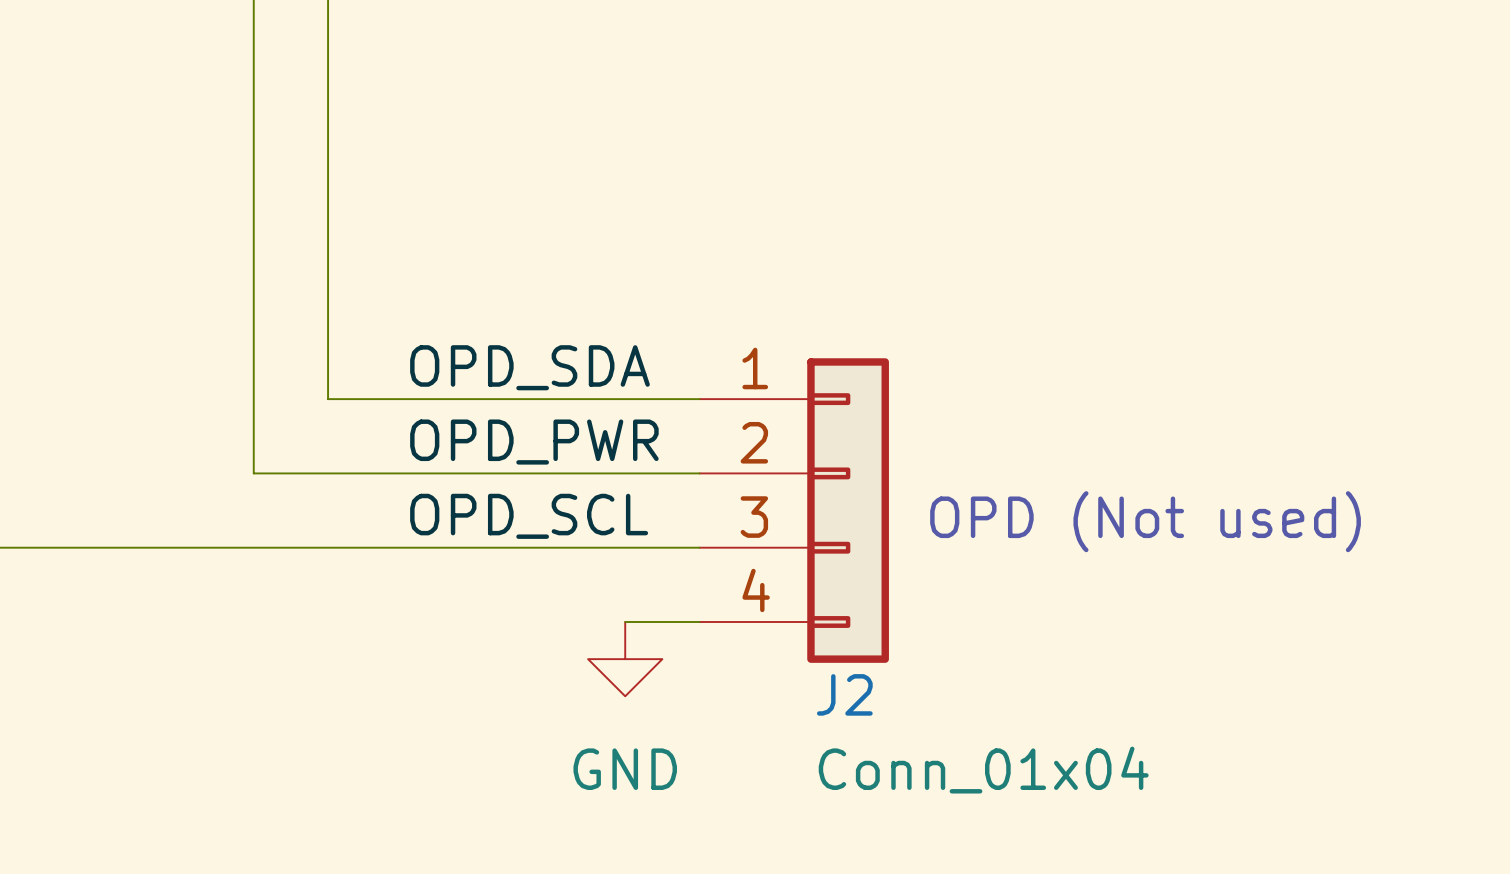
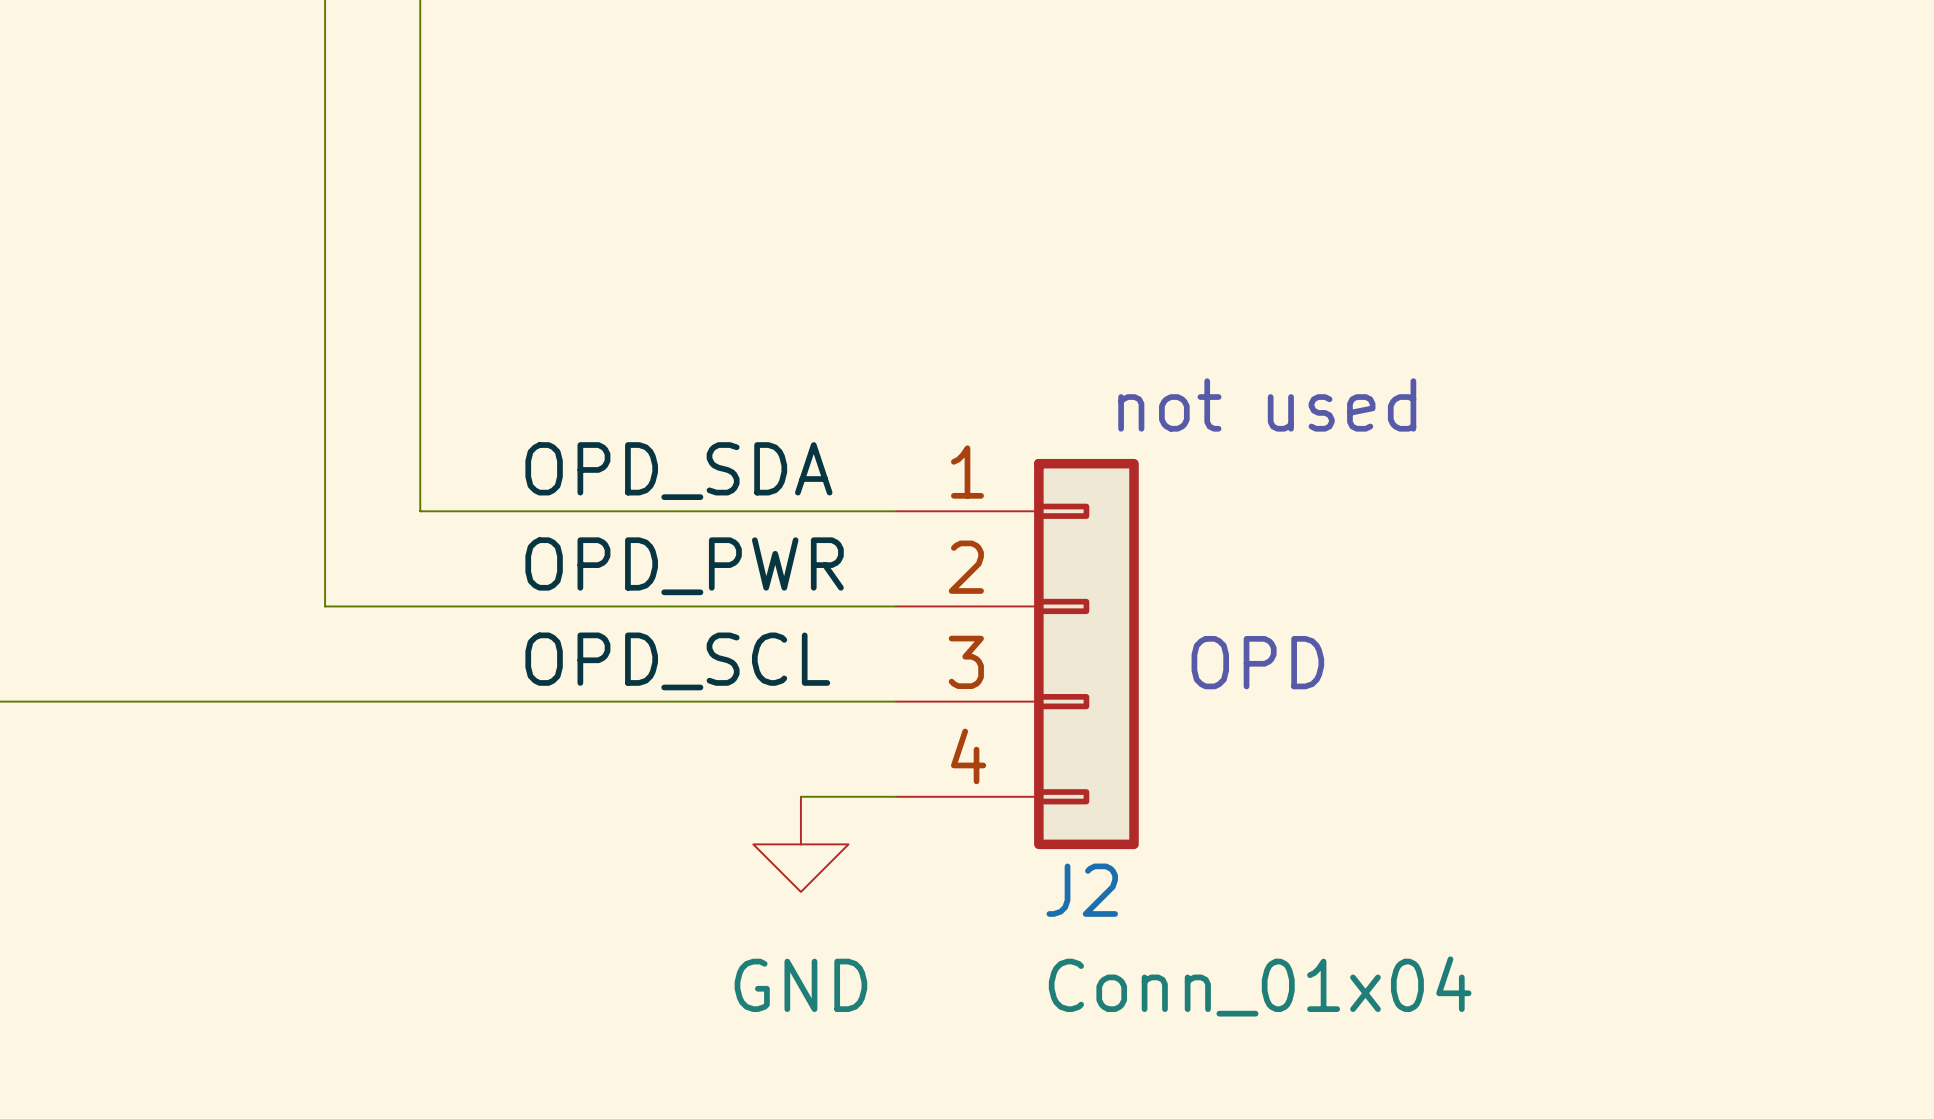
text: none -> not used (1267, 404)
text: OPD (Not used) (1145, 521) -> OPD (1257, 662)

